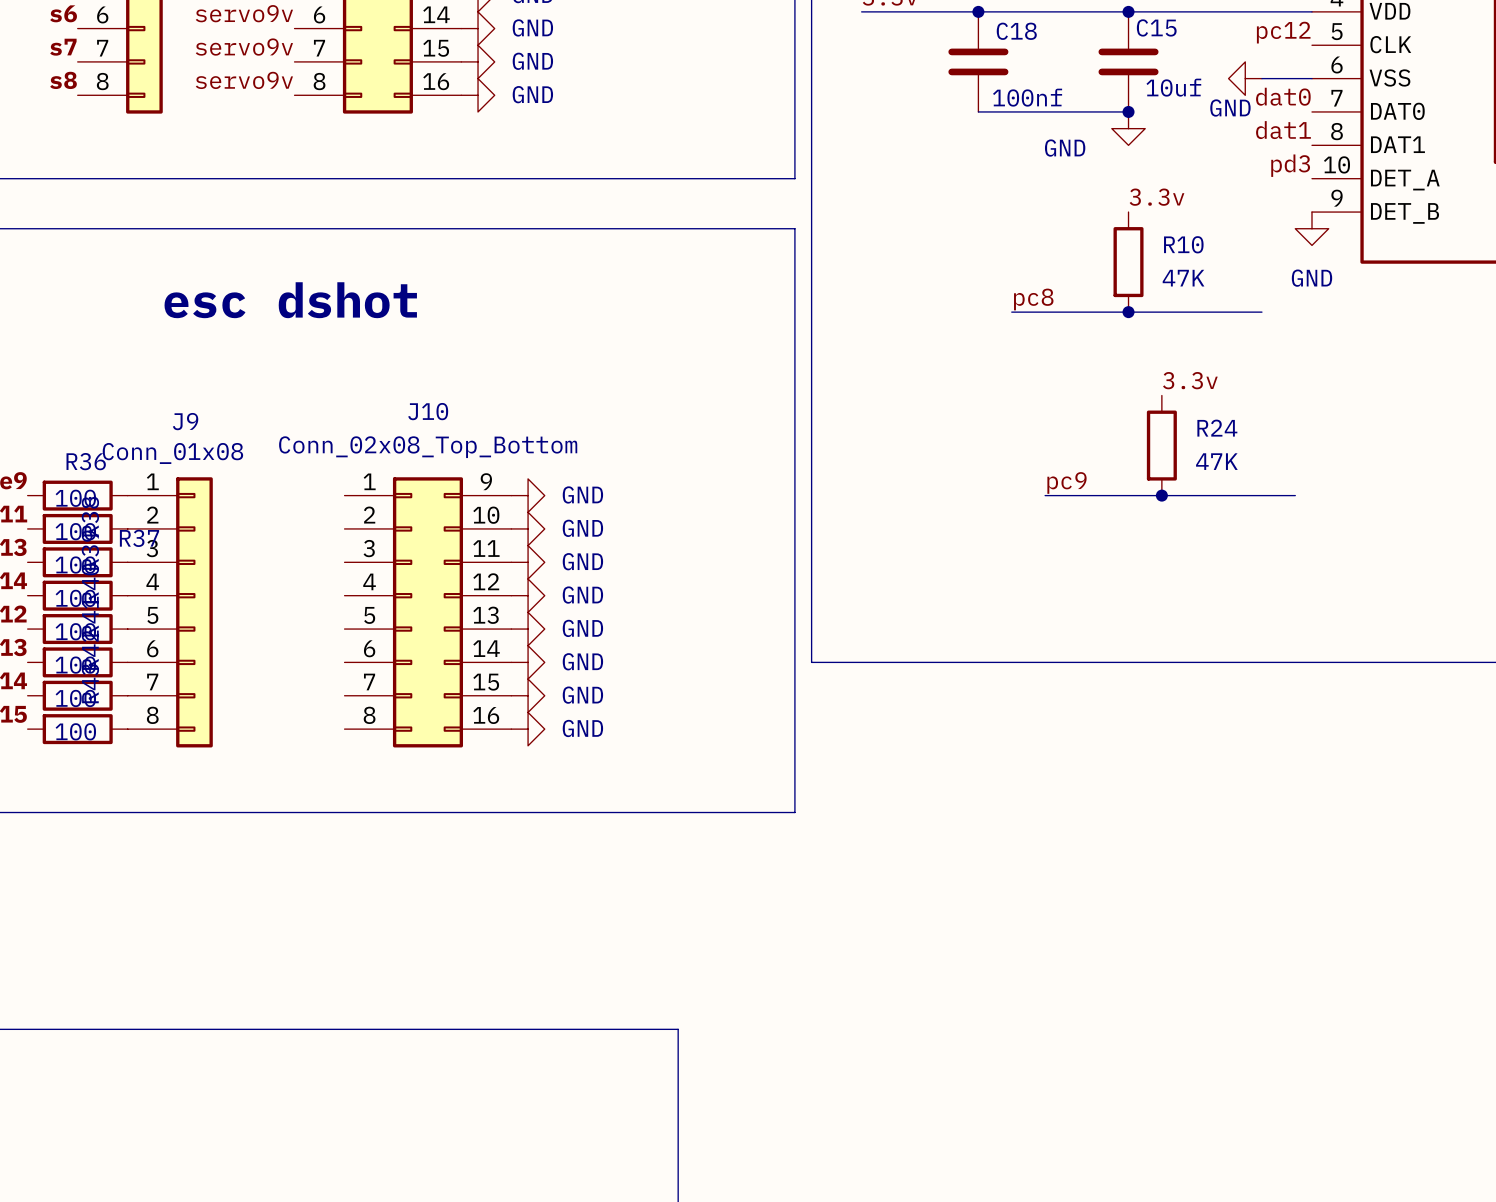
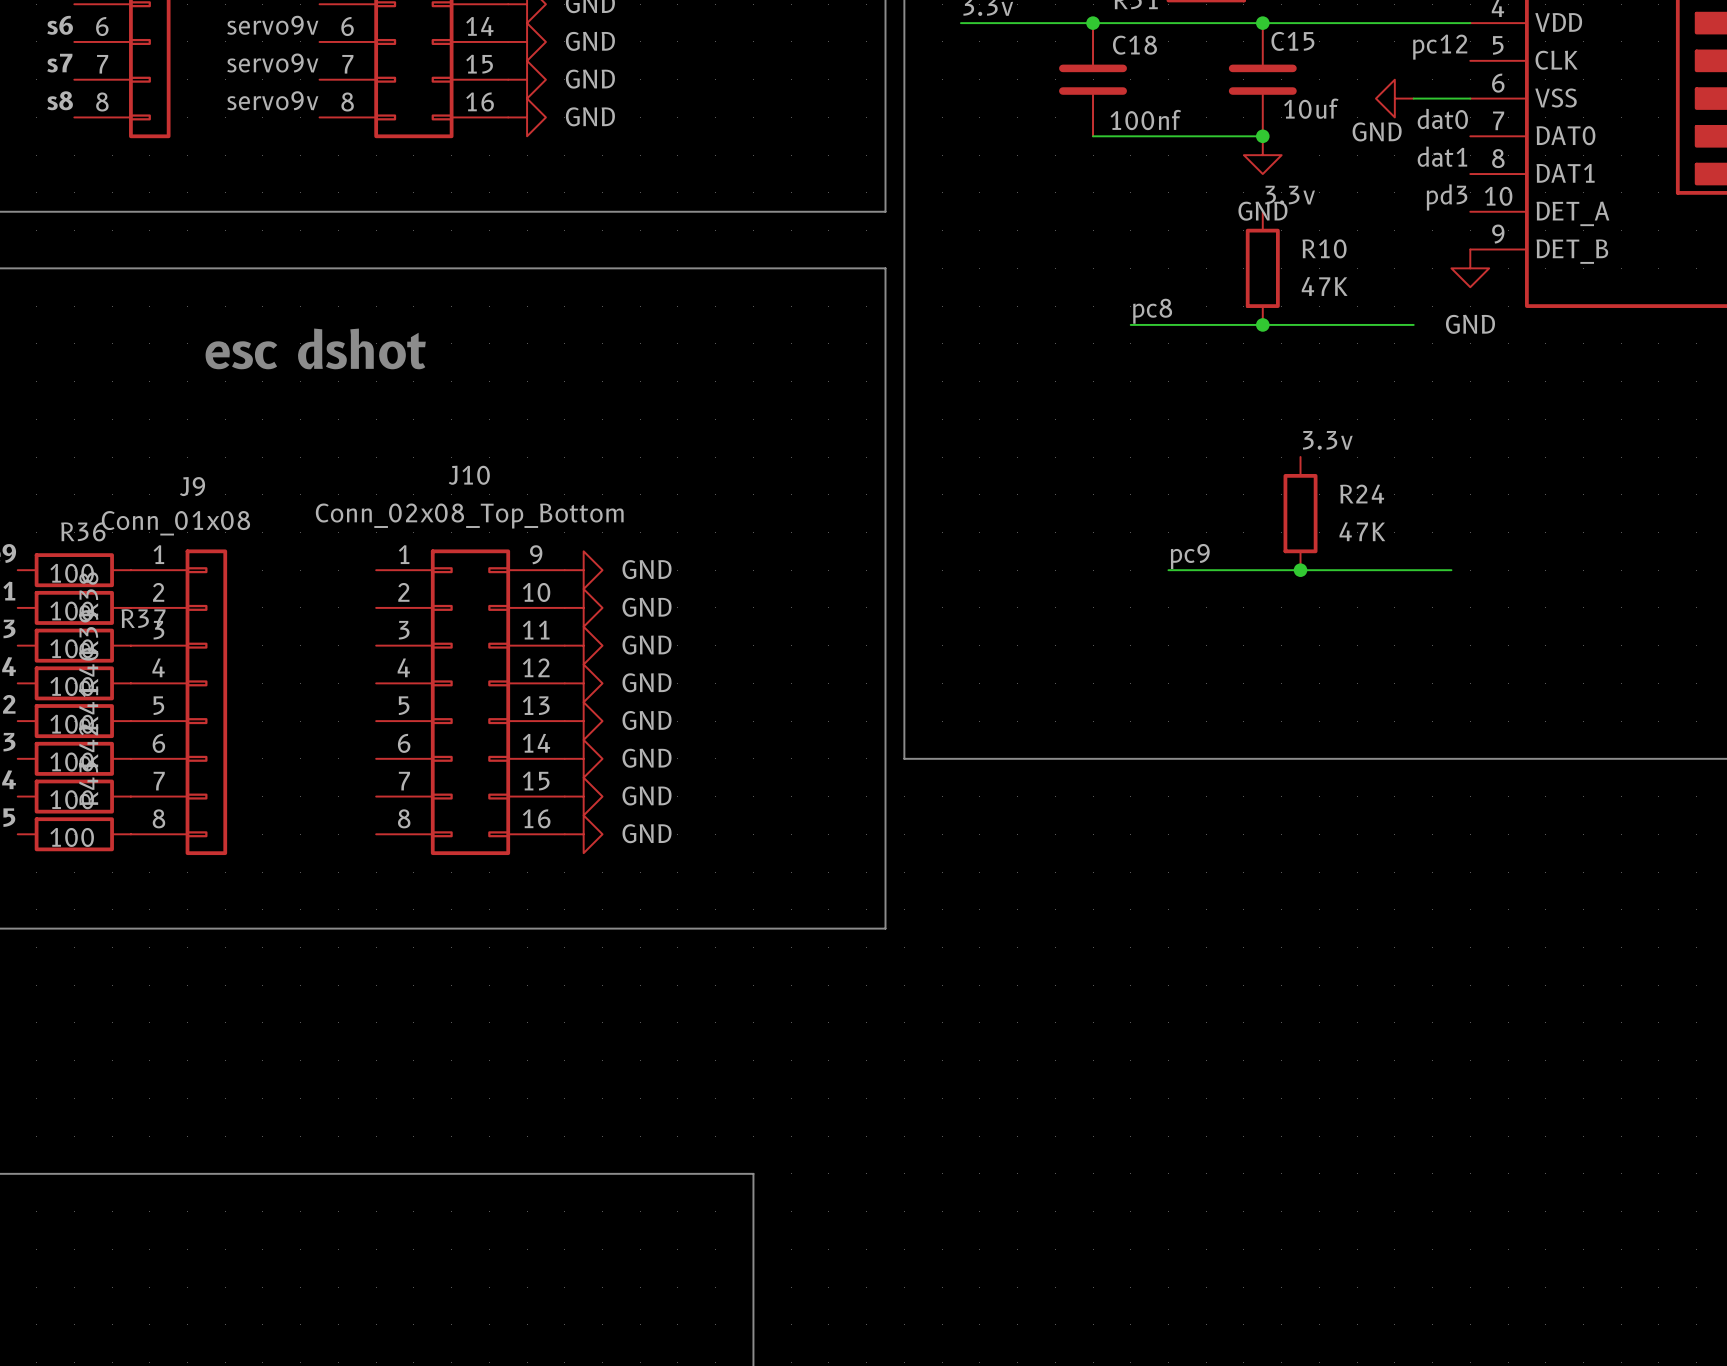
power symbol text position: GND (1065, 148) -> GND (1262, 211)
label position: 3.3v (1157, 197) -> 3.3v (1290, 195)
R10 position: (1128, 262) -> (1262, 268)
label position: pc8 (1033, 299) -> pc8 (1152, 311)
wire: (1011, 312) (1261, 312) -> (1130, 324) (1413, 324)
junction position: (1128, 312) -> (1262, 324)

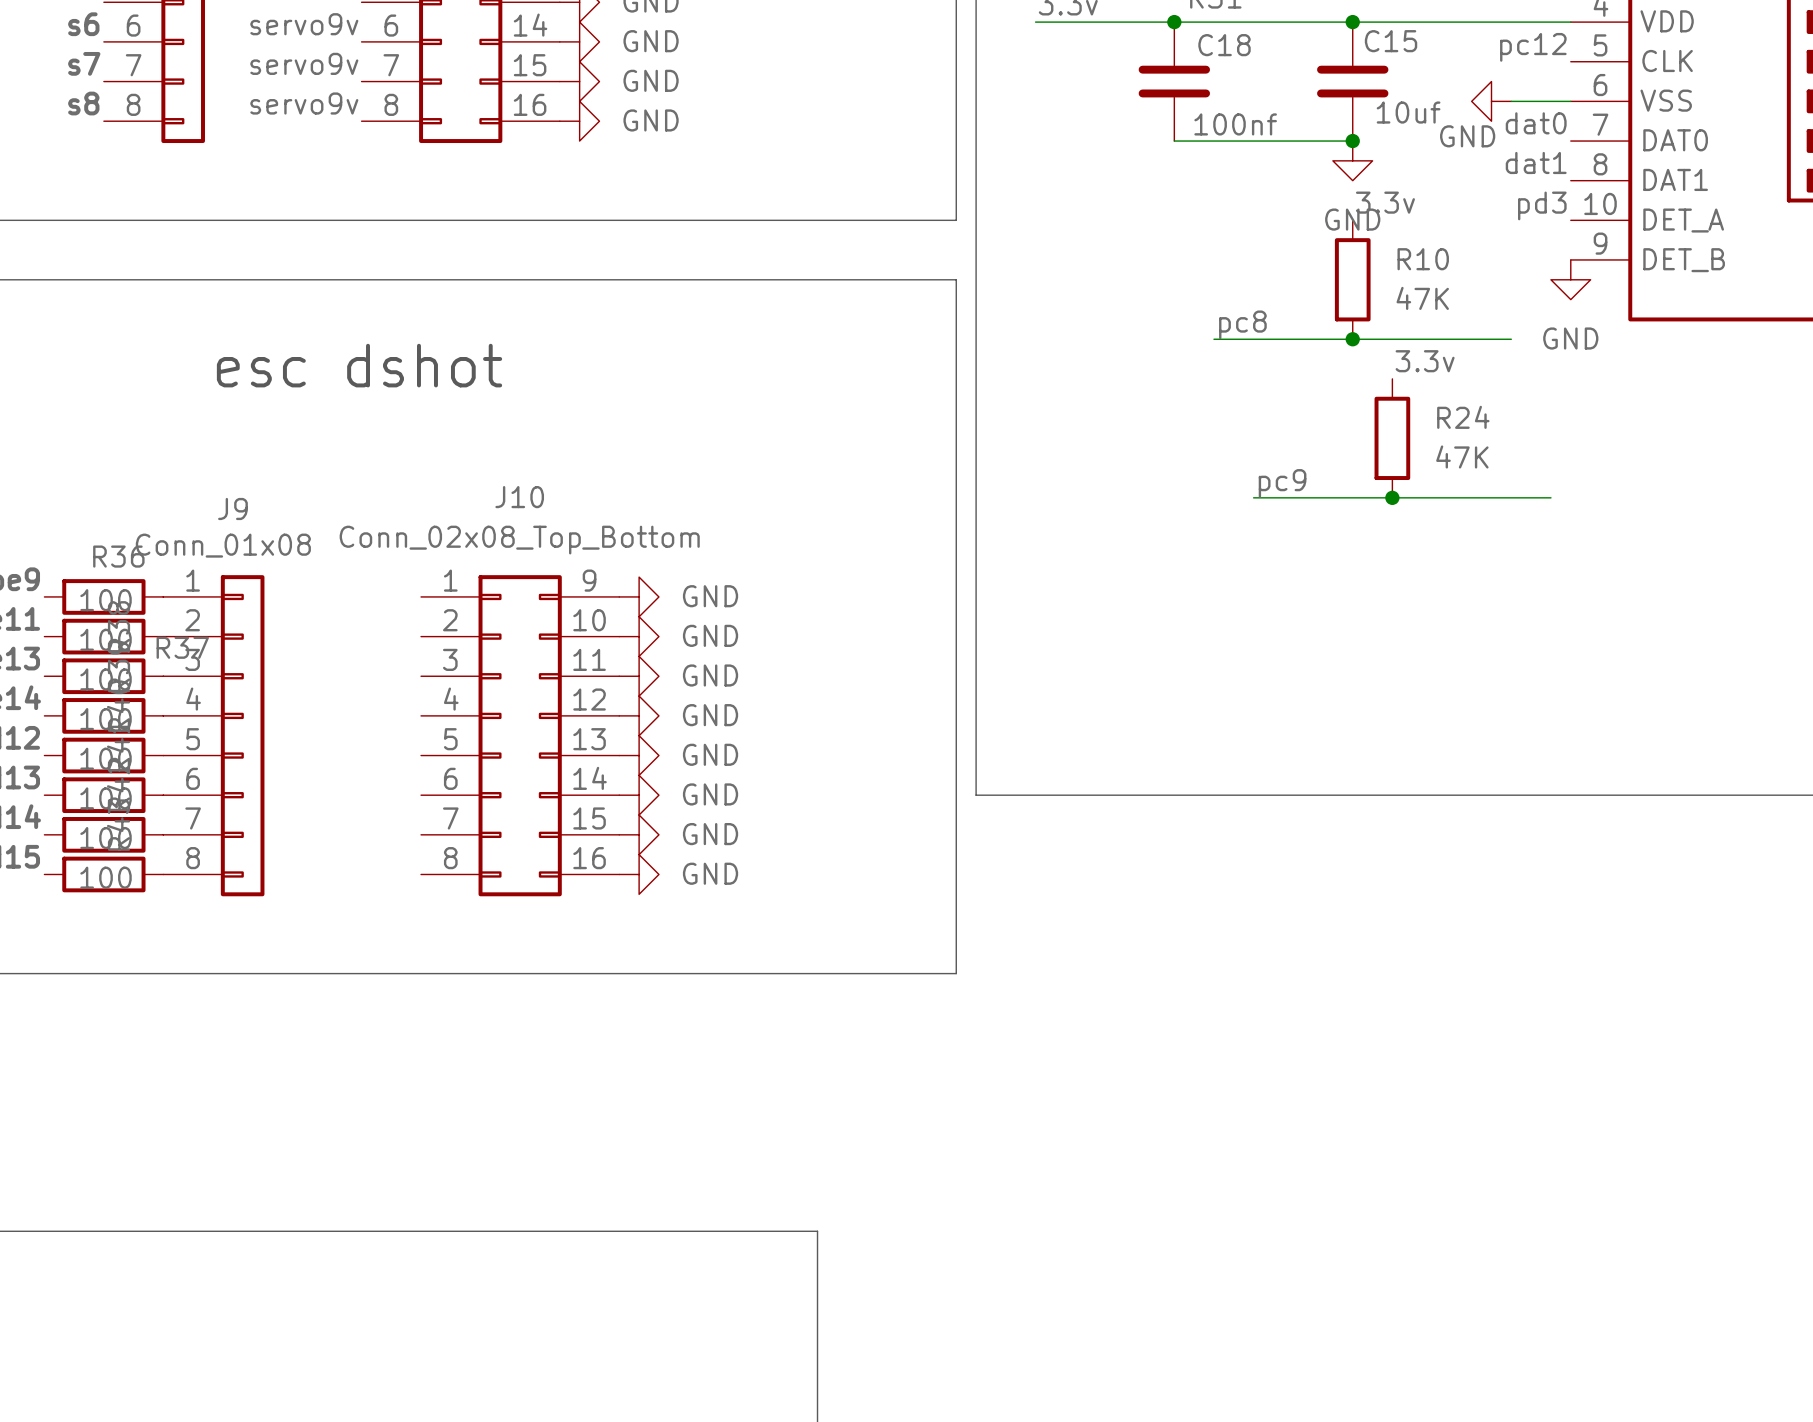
label position: 3.3v (1327, 440) -> 3.3v (1425, 361)
junction: none -> (1392, 497)
R24 position: (1300, 513) -> (1392, 438)
label position: pc9 (1190, 556) -> pc9 (1282, 483)
wire: (1168, 570) (1451, 570) -> (1253, 497) (1550, 497)
junction: (1300, 570) -> none

